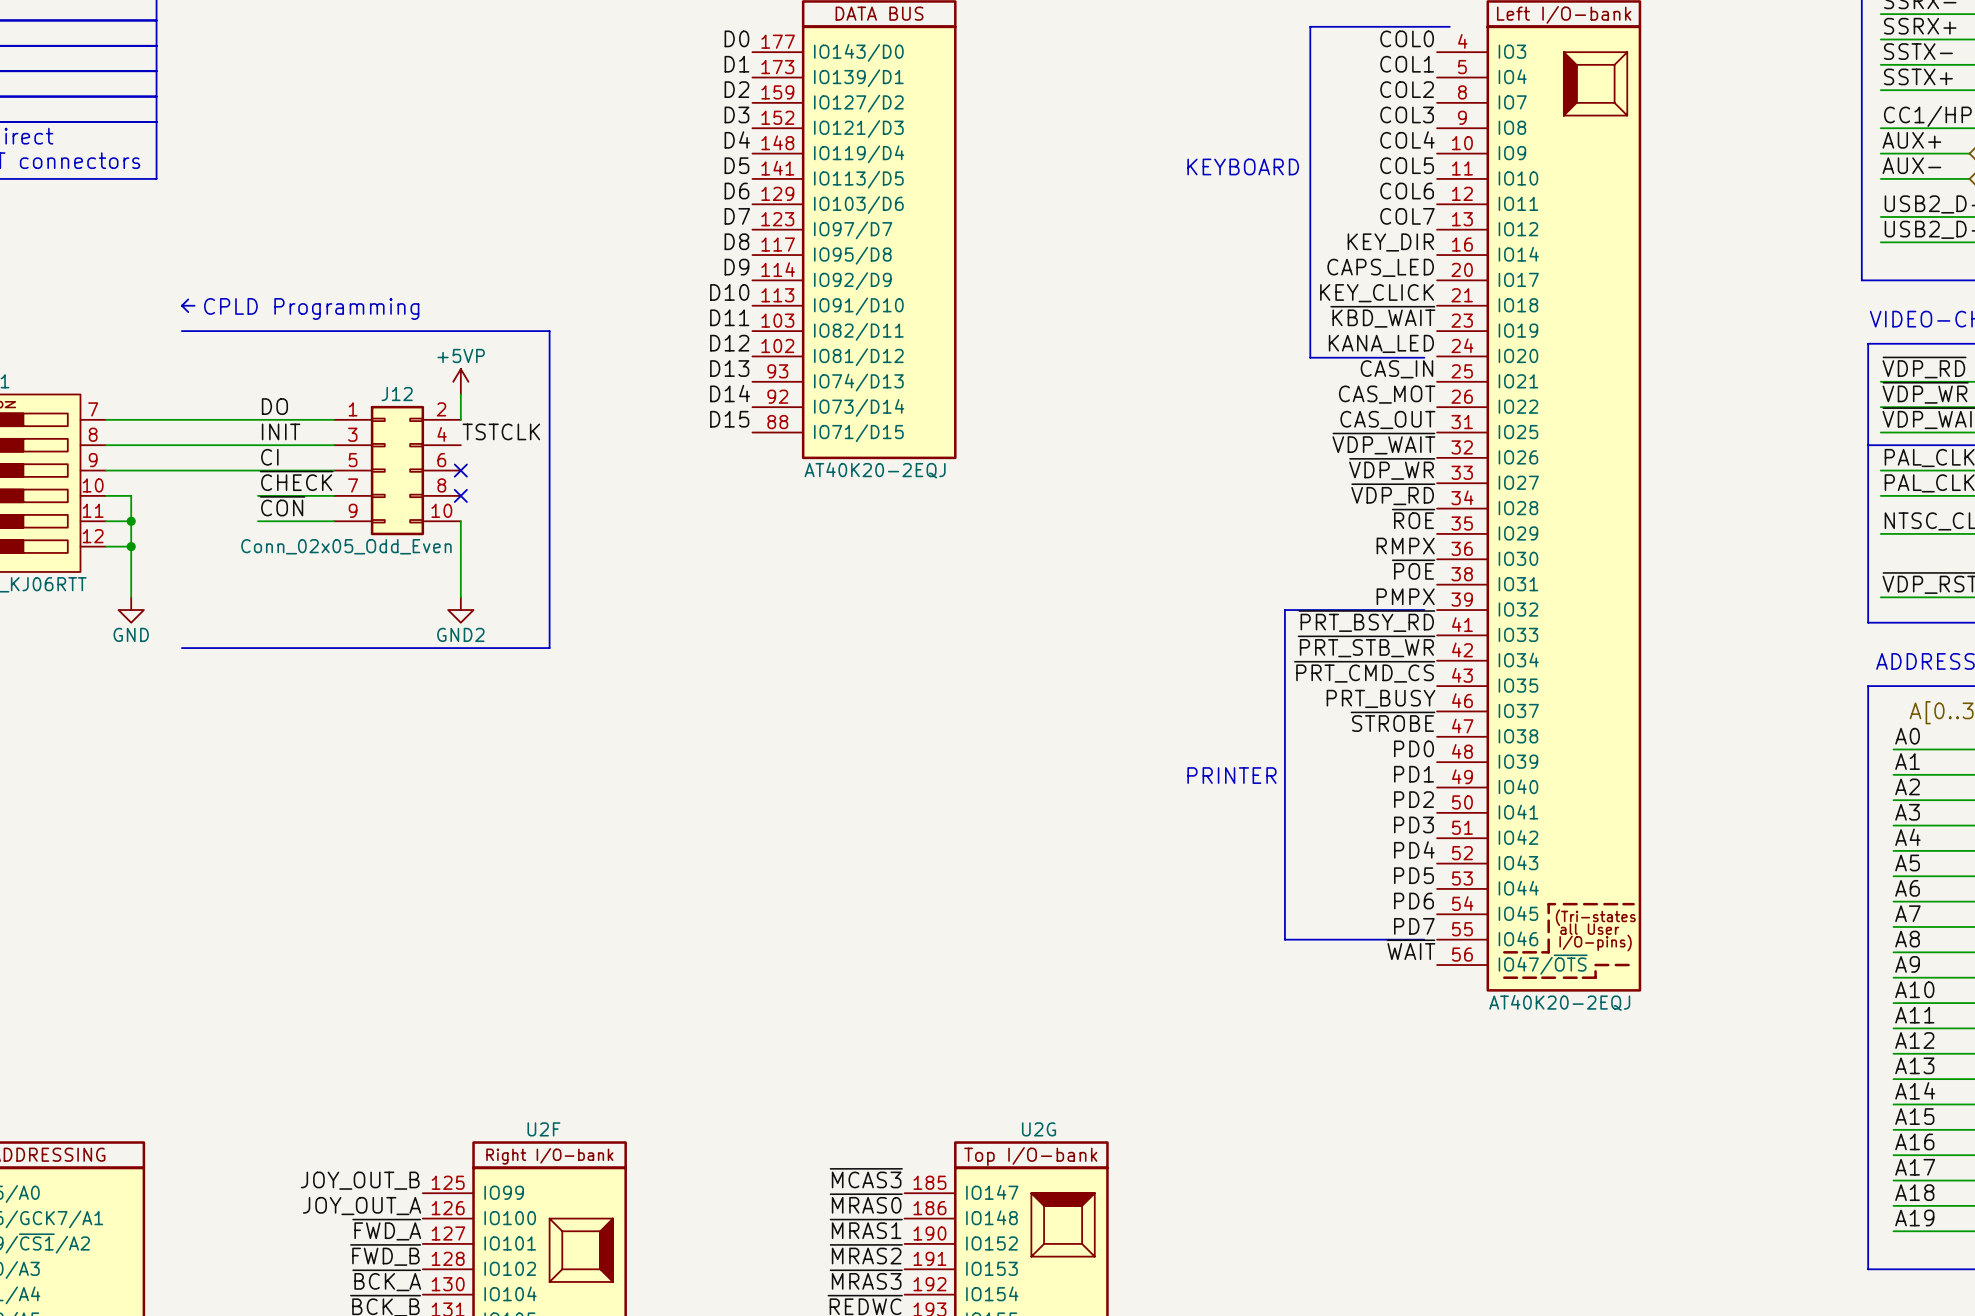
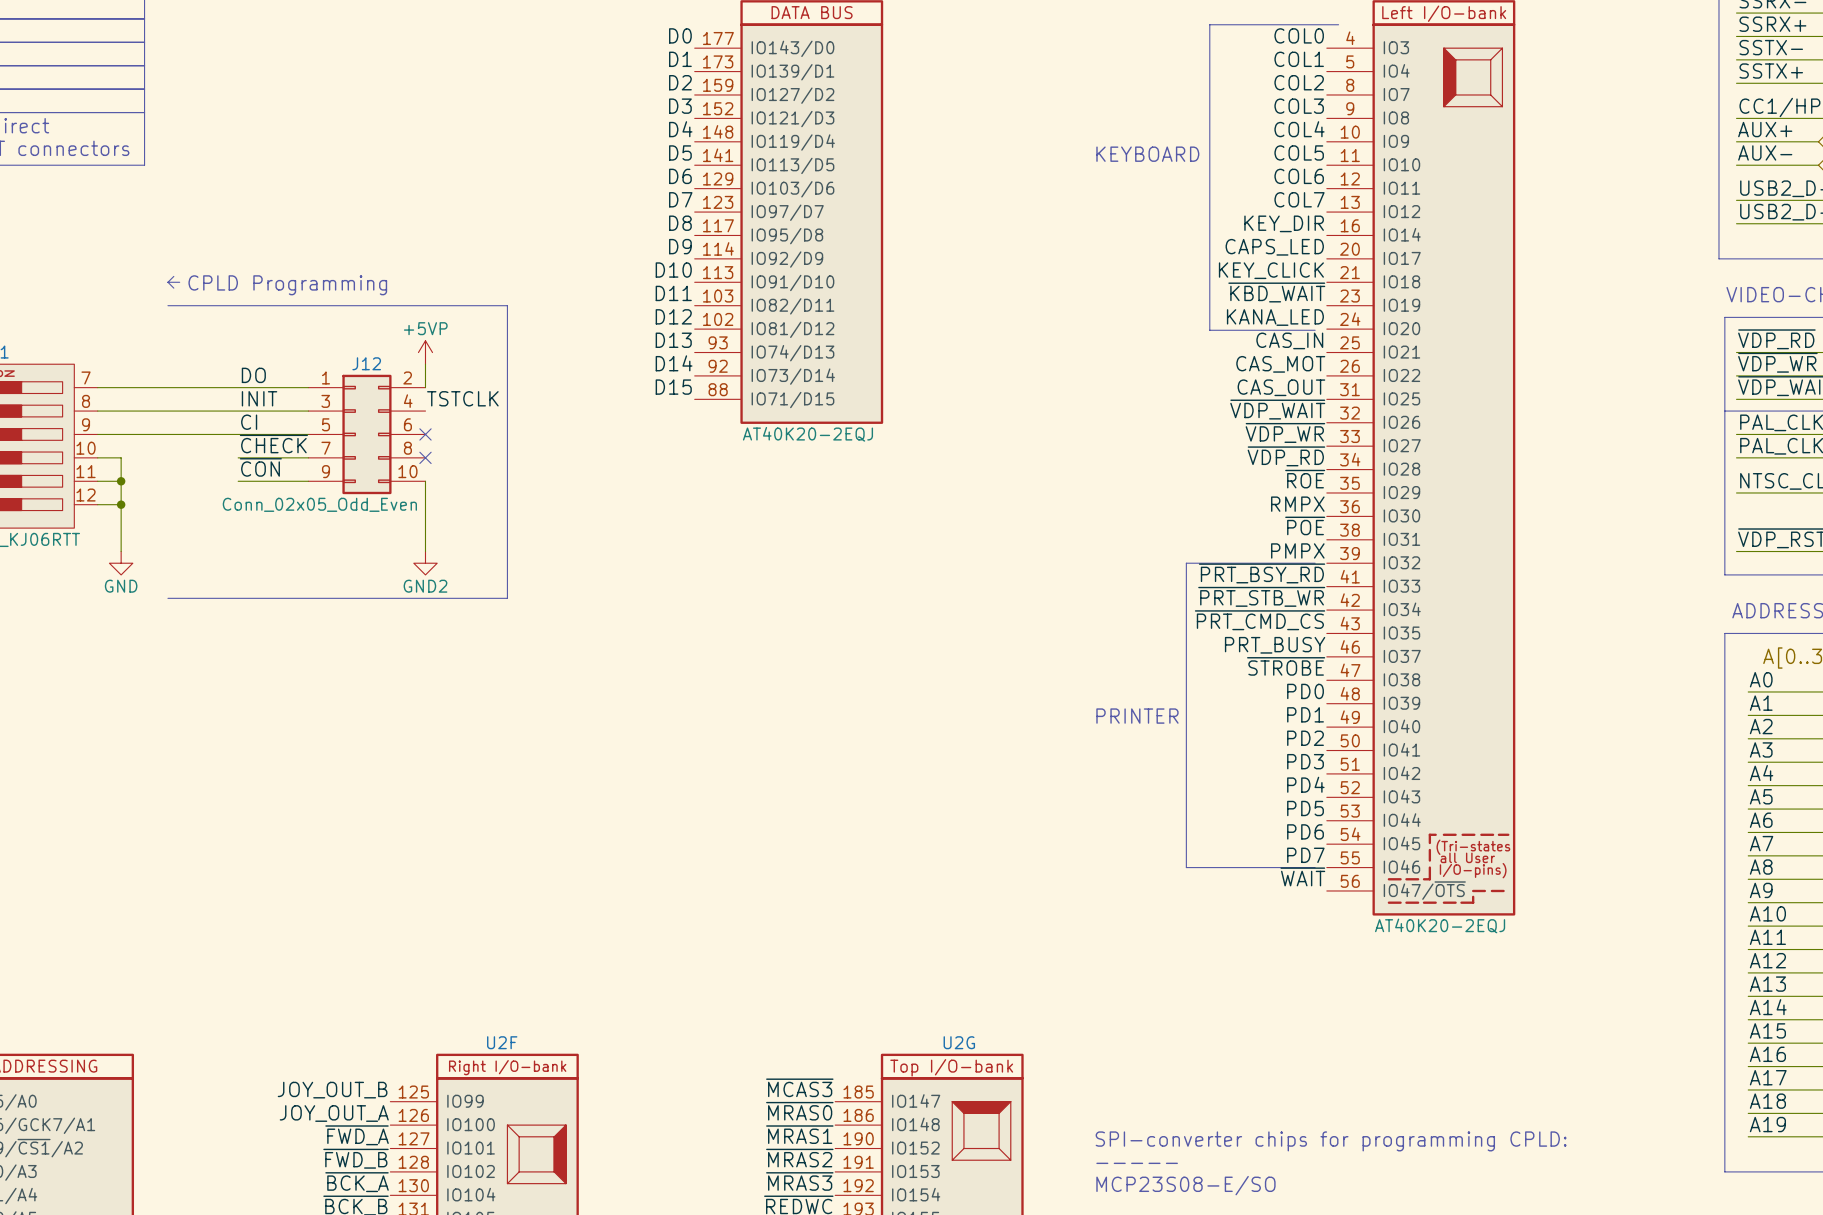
text: none -> SPI-converter chips for programming CPLD: (1331, 1141)
text: none -> ----- (1137, 1163)
text: none -> MCP23S08-E/SO (1185, 1185)

